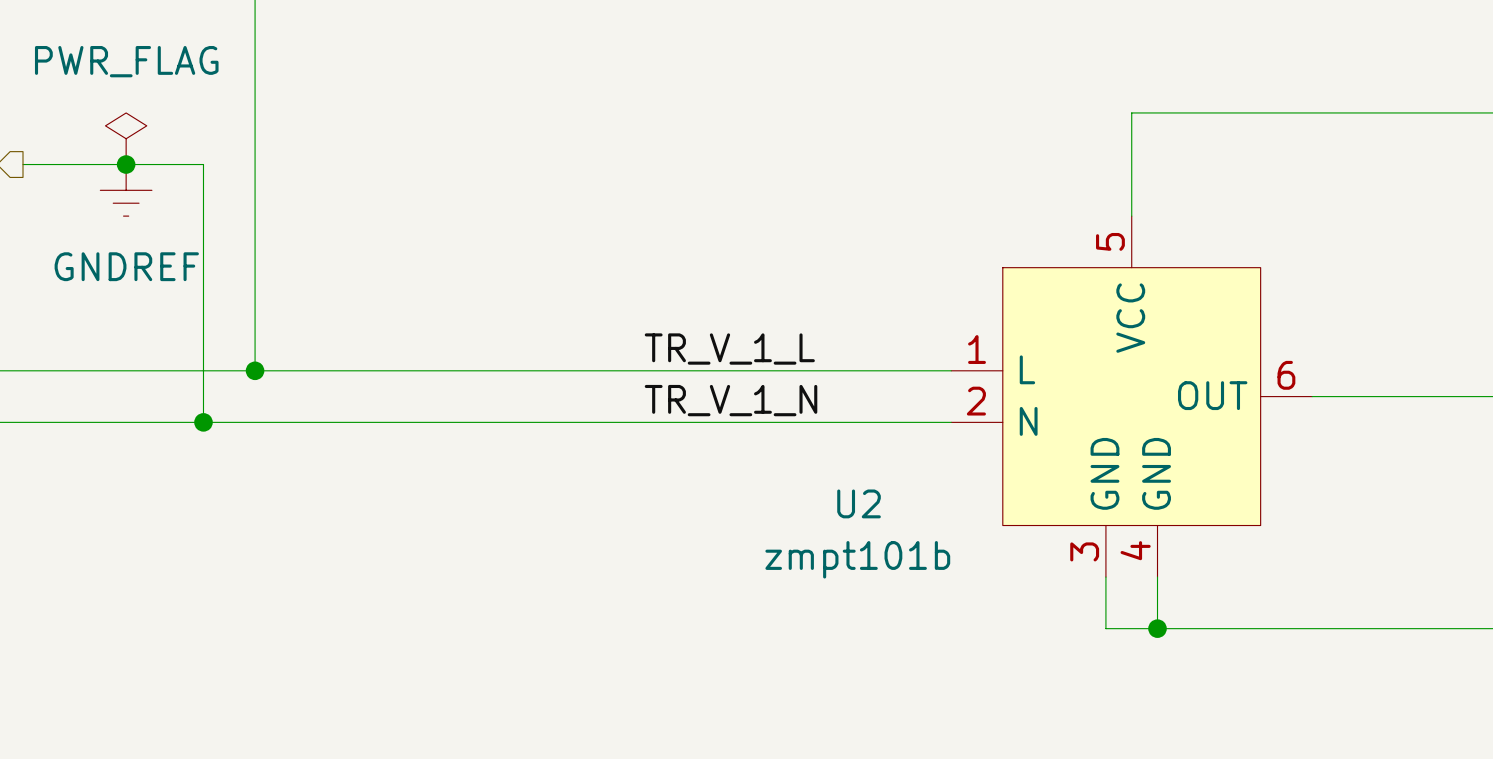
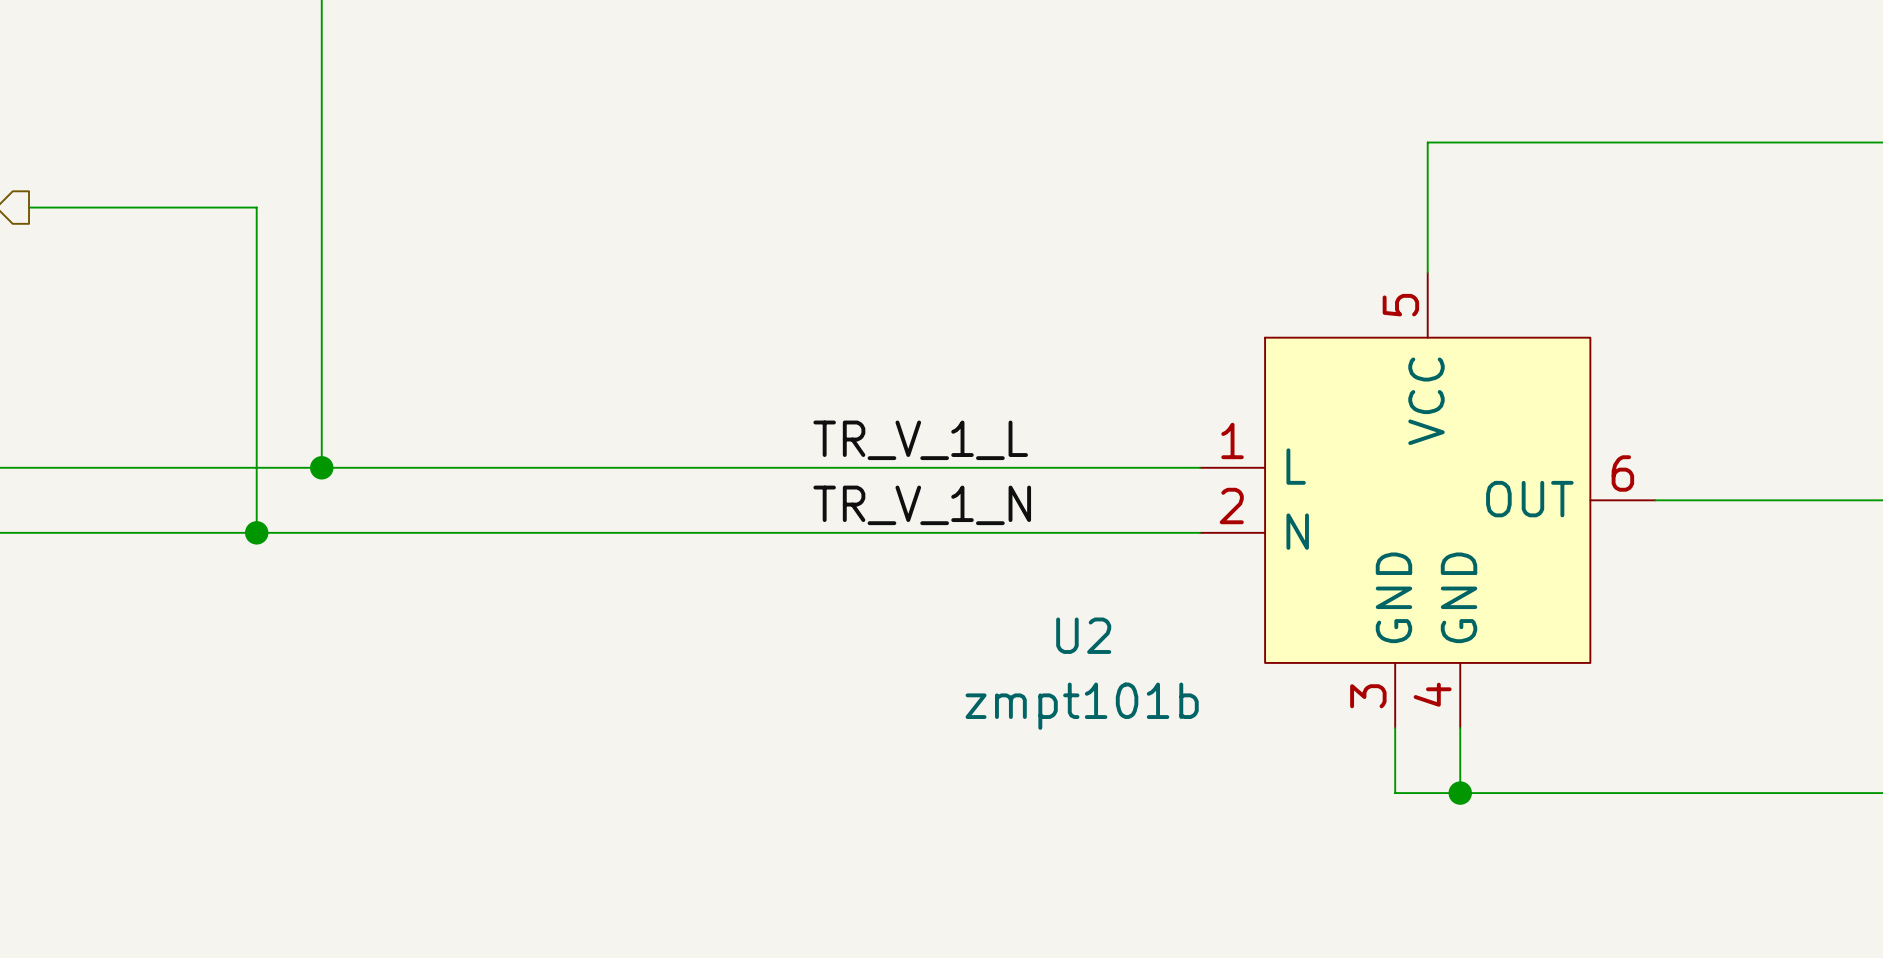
power symbol: PWR_FLAG (126, 138) -> none
junction: (126, 164) -> none
power symbol: GNDREF (126, 190) -> none

